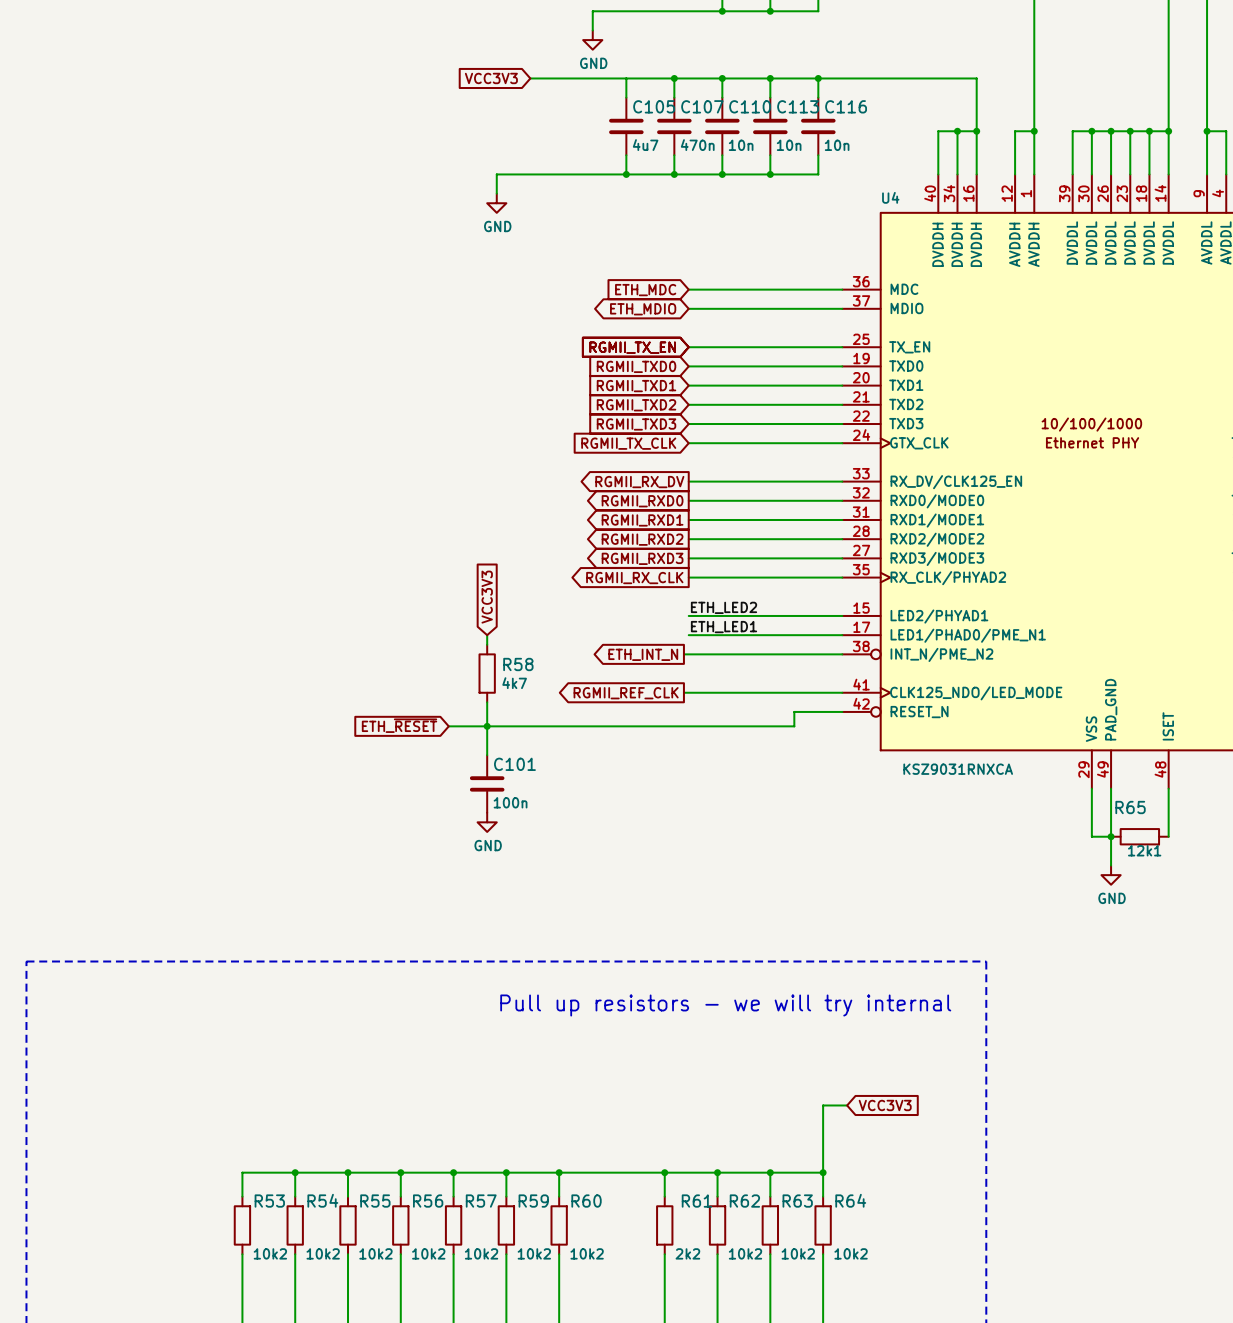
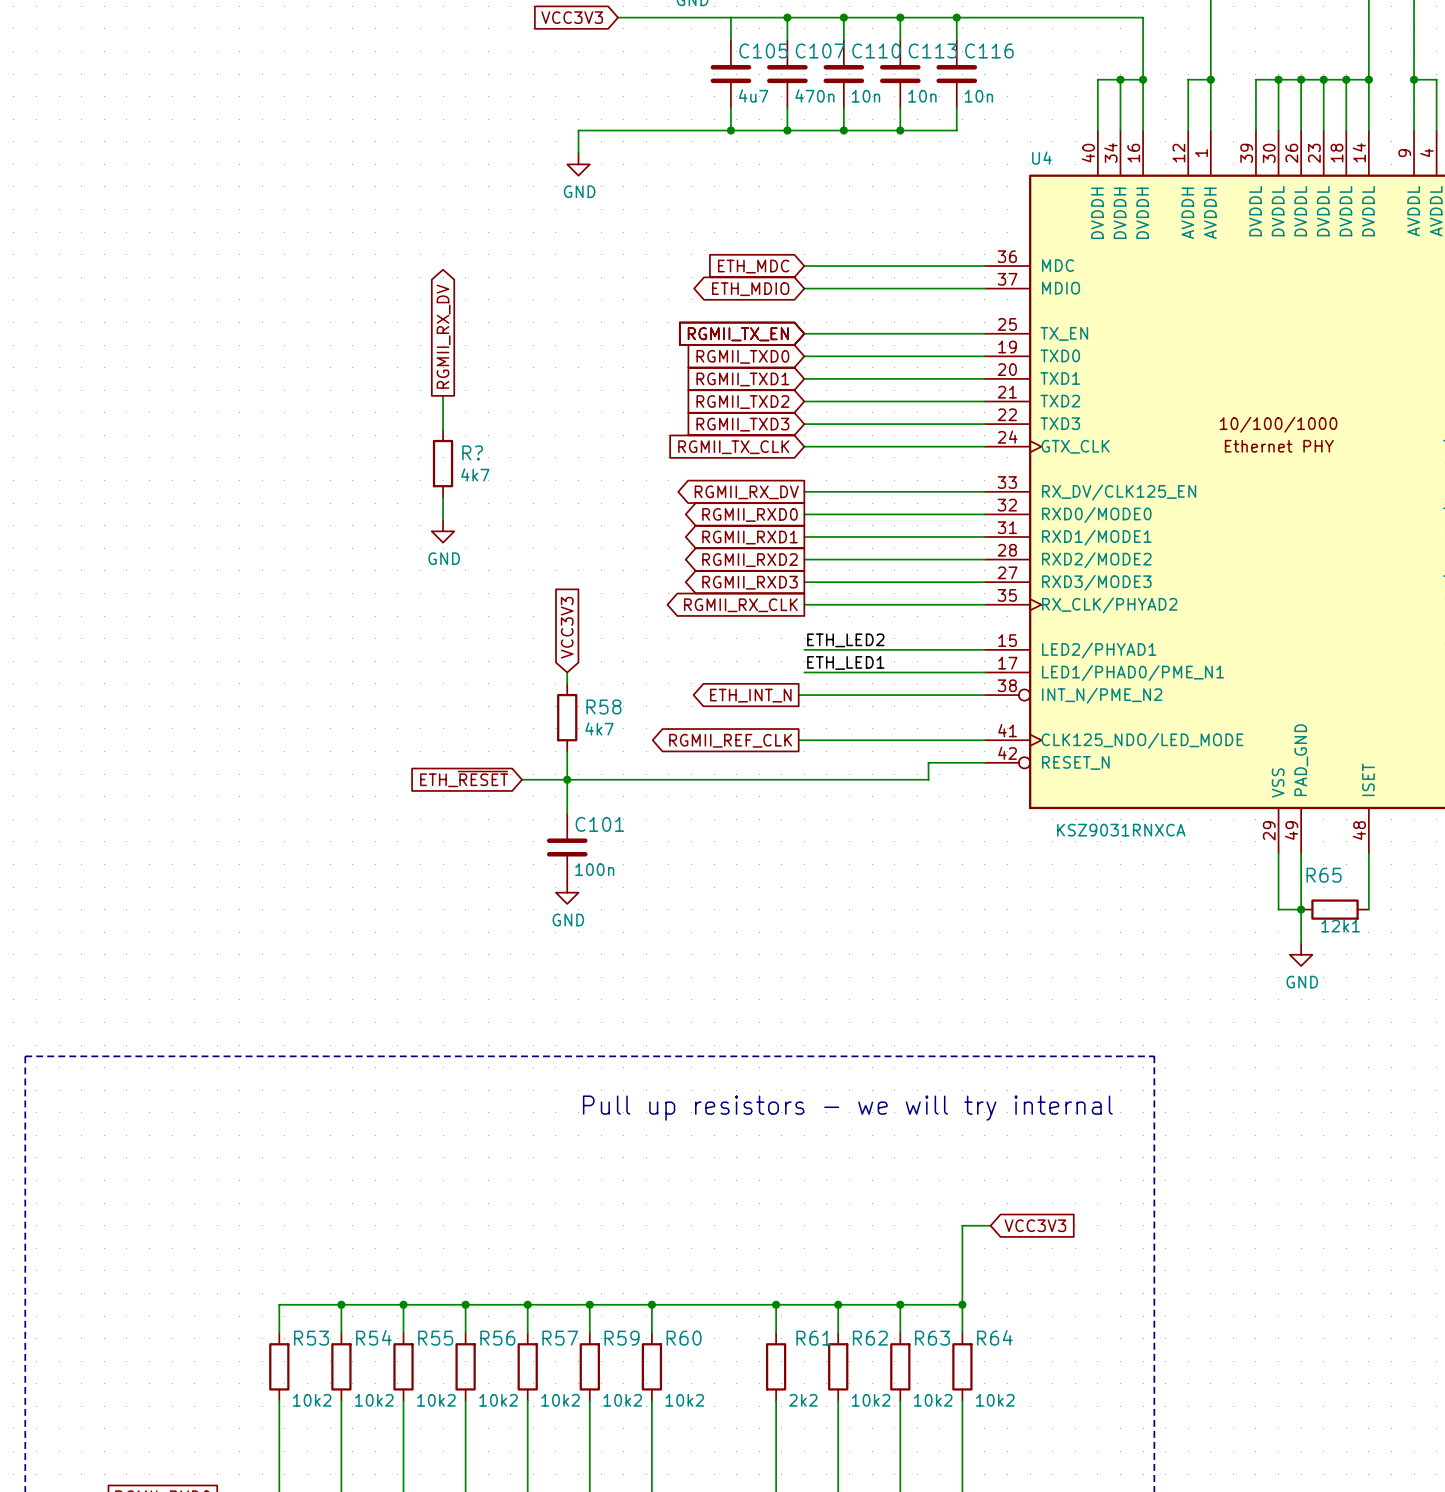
global label: none -> RGMII_RX_DV (443, 336)
wire: none -> (443, 395) (443, 429)
R?: none -> (443, 463)
wire: none -> (443, 497) (443, 520)
power symbol: none -> GND (443, 531)

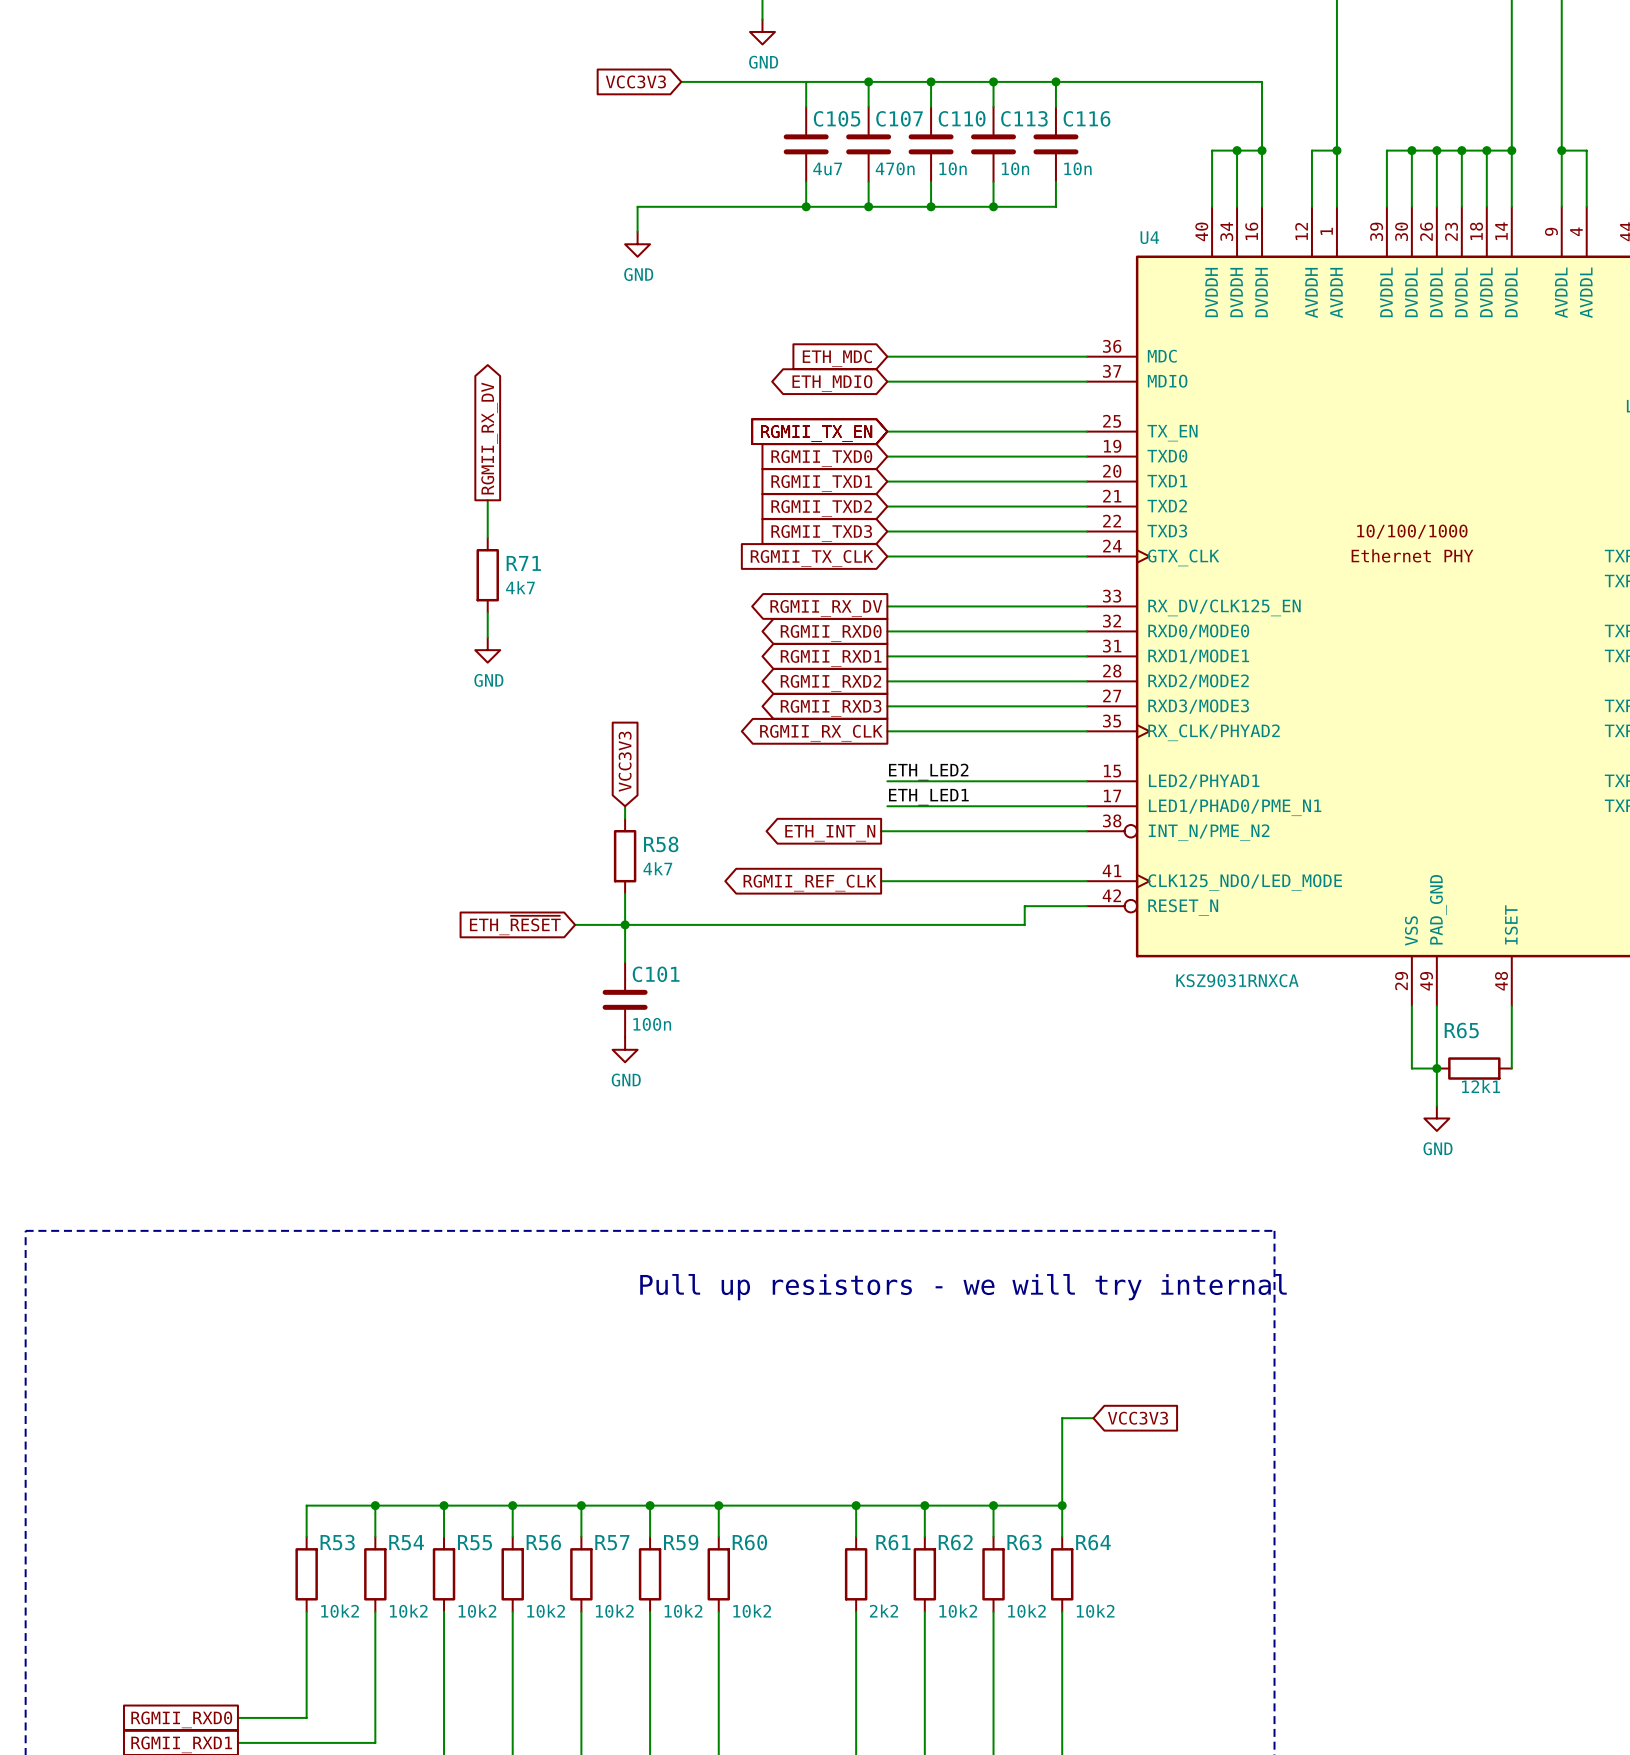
R? name: R? (472, 452) -> R71 (523, 563)

